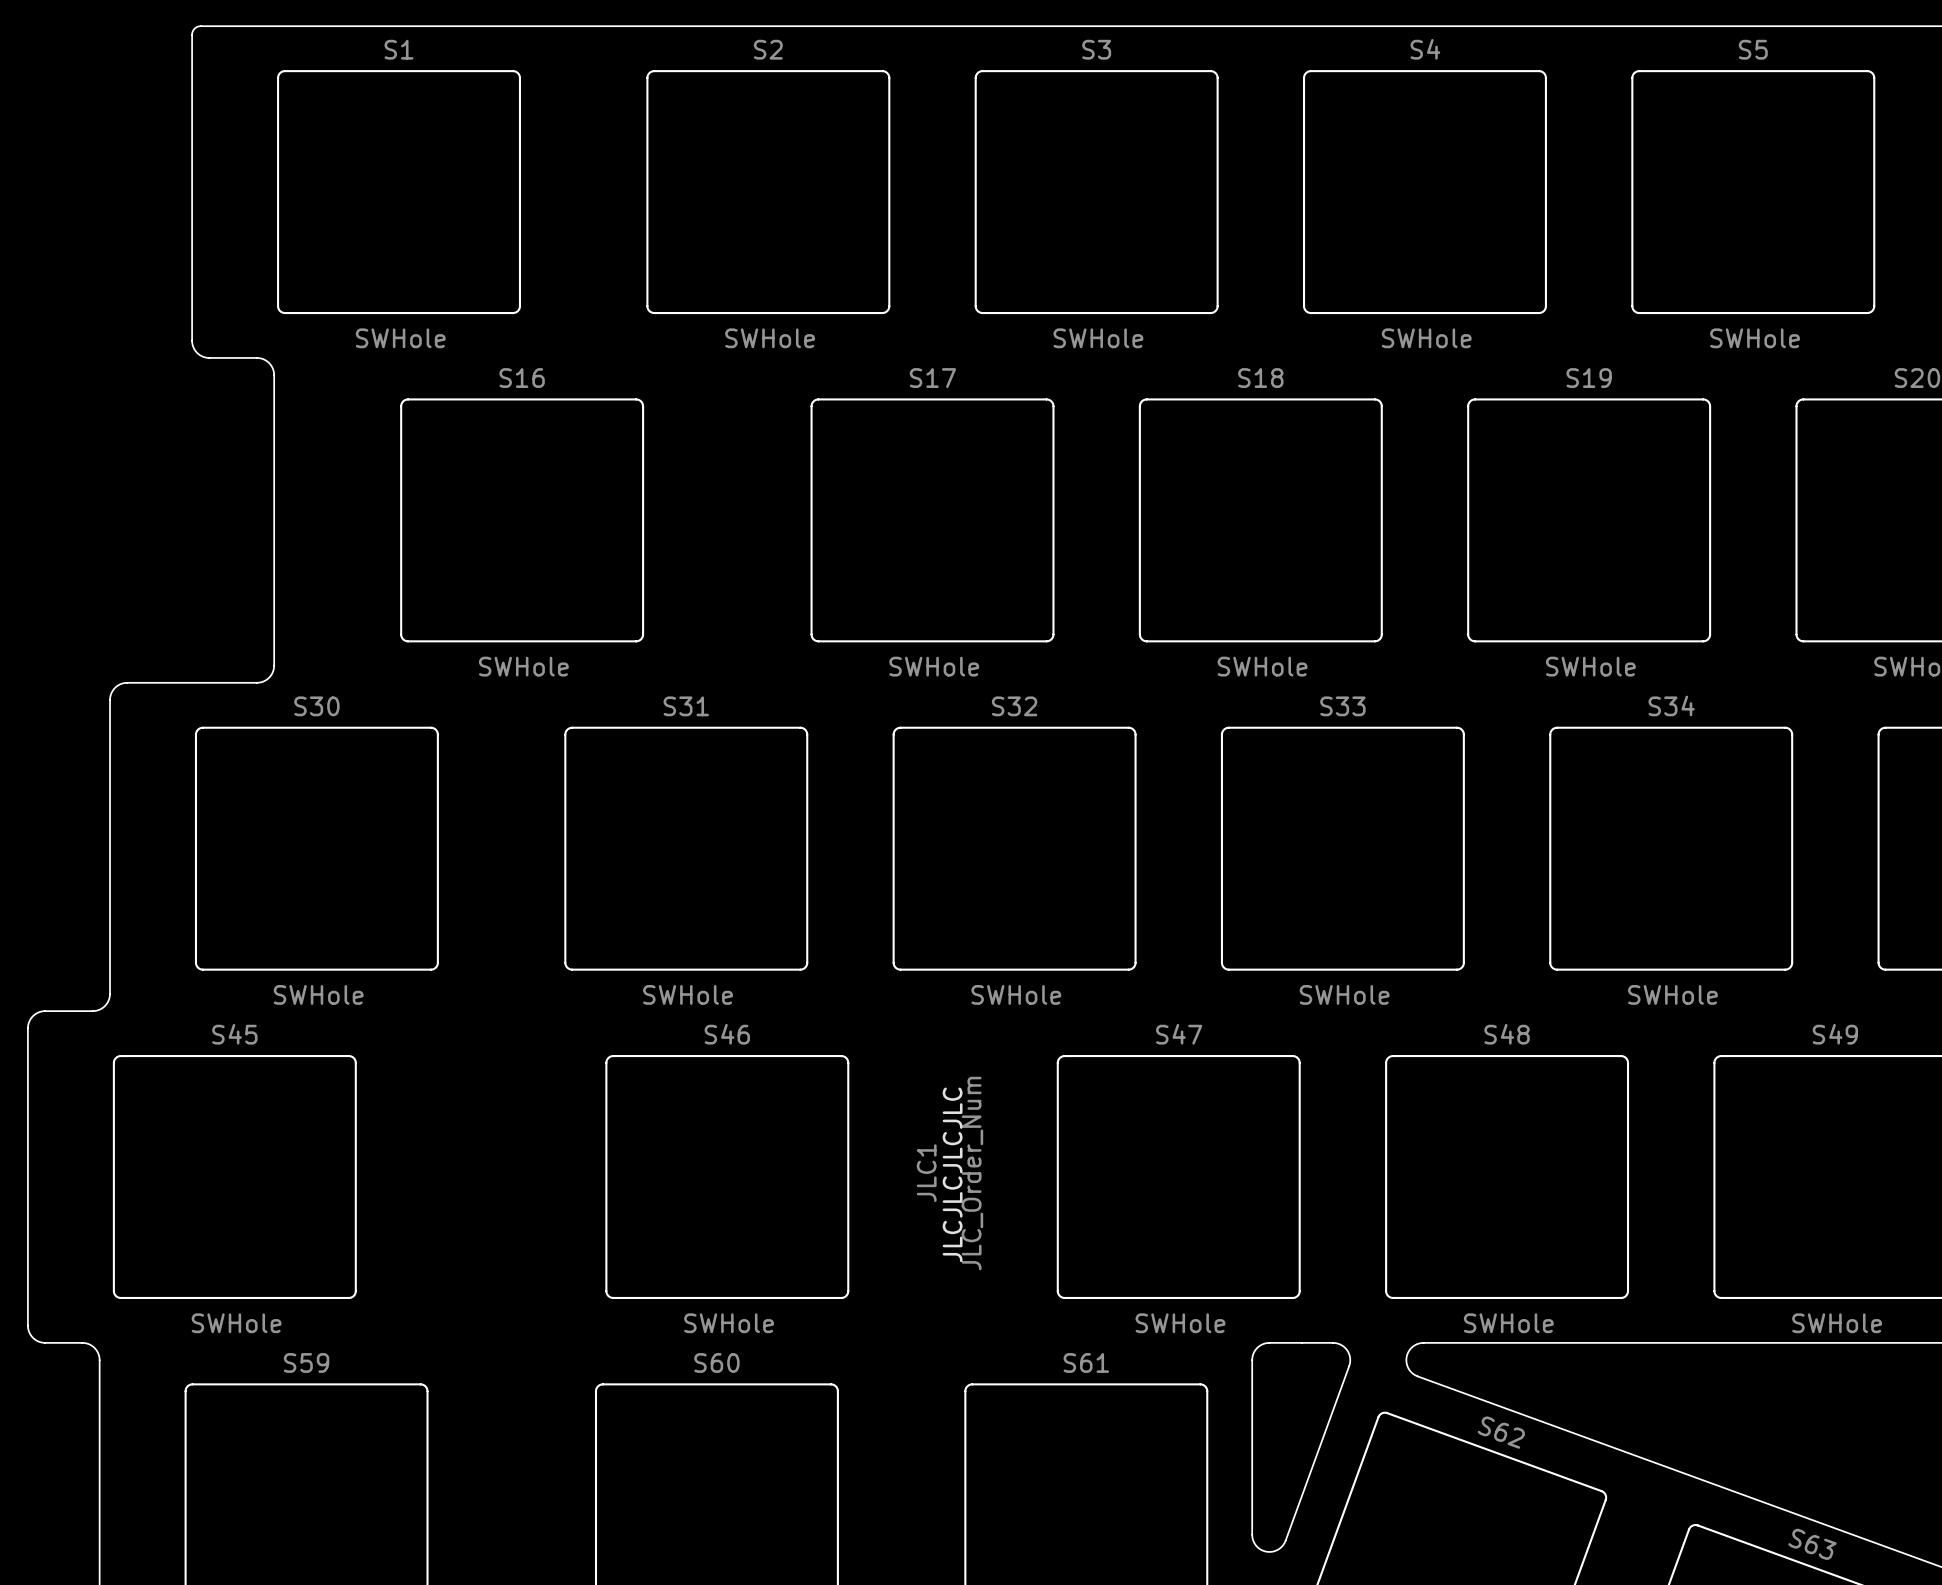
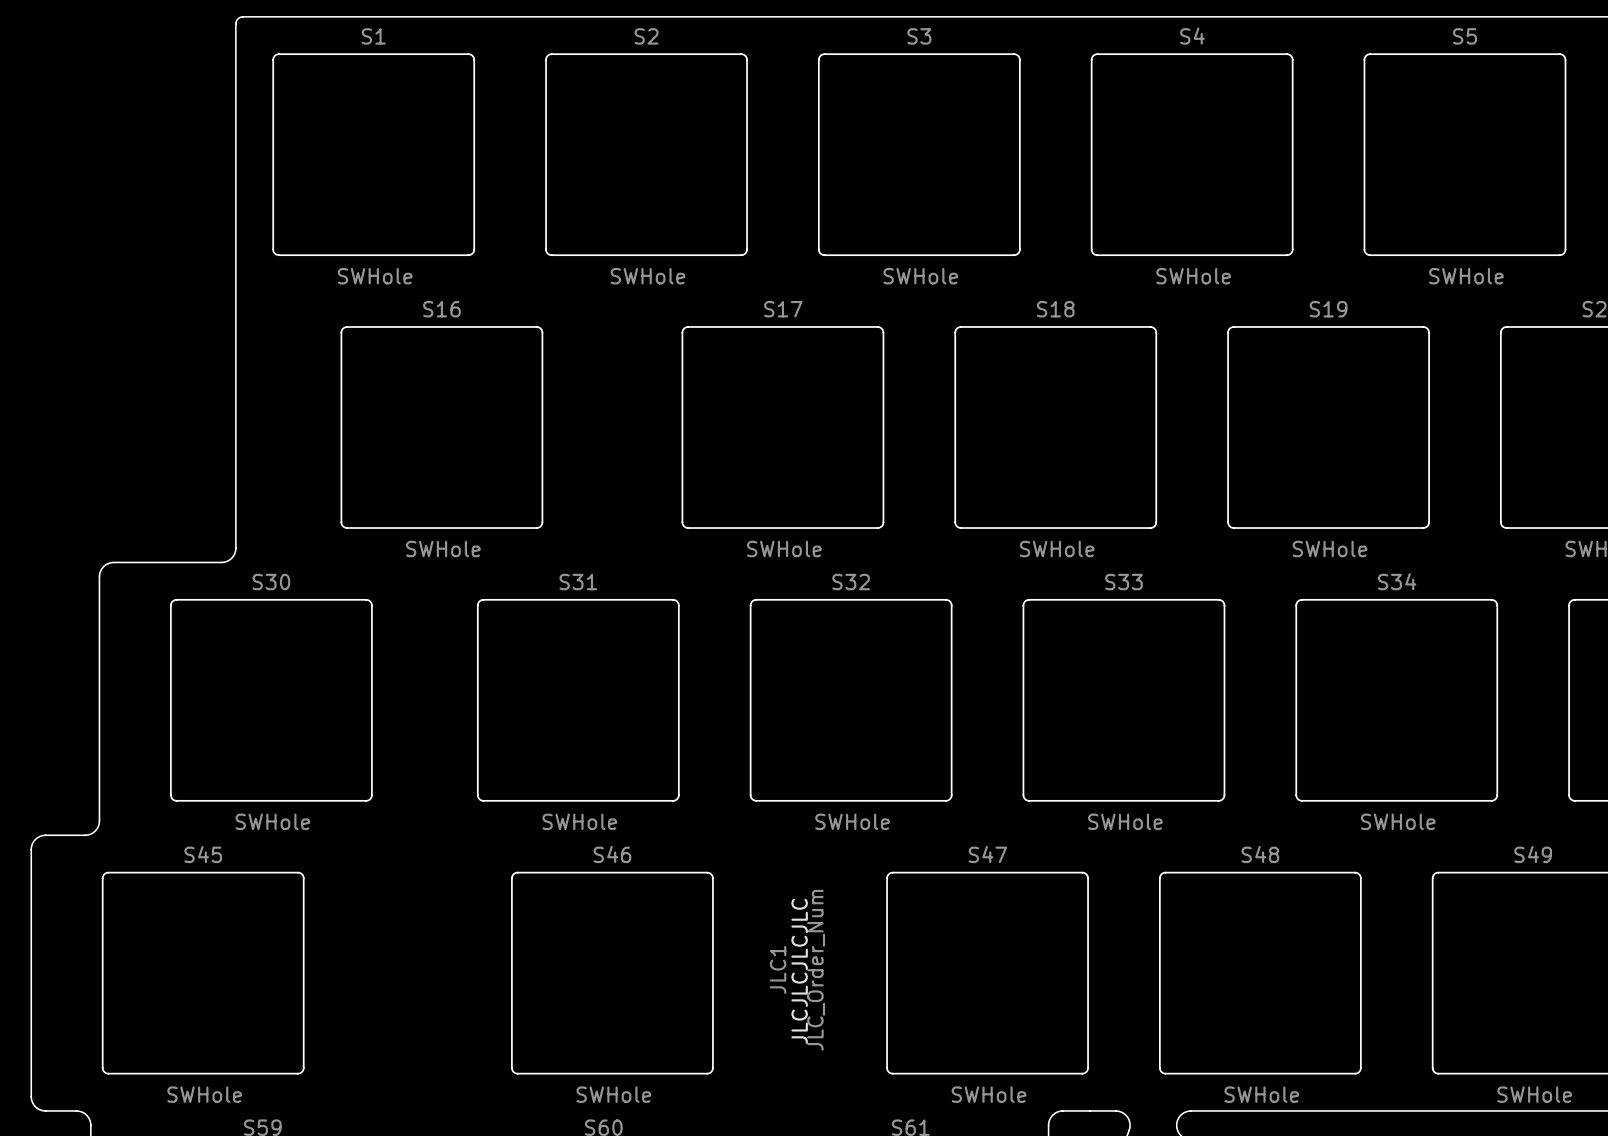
board edge: (282, 26) (199, 26) (193, 29) (192, 34) (192, 344) (197, 352) (205, 357) (262, 358) (271, 366) (274, 375) -> (243, 16) (237, 18) (235, 24) (235, 306)
S1 position: (399, 192) -> (373, 154)

